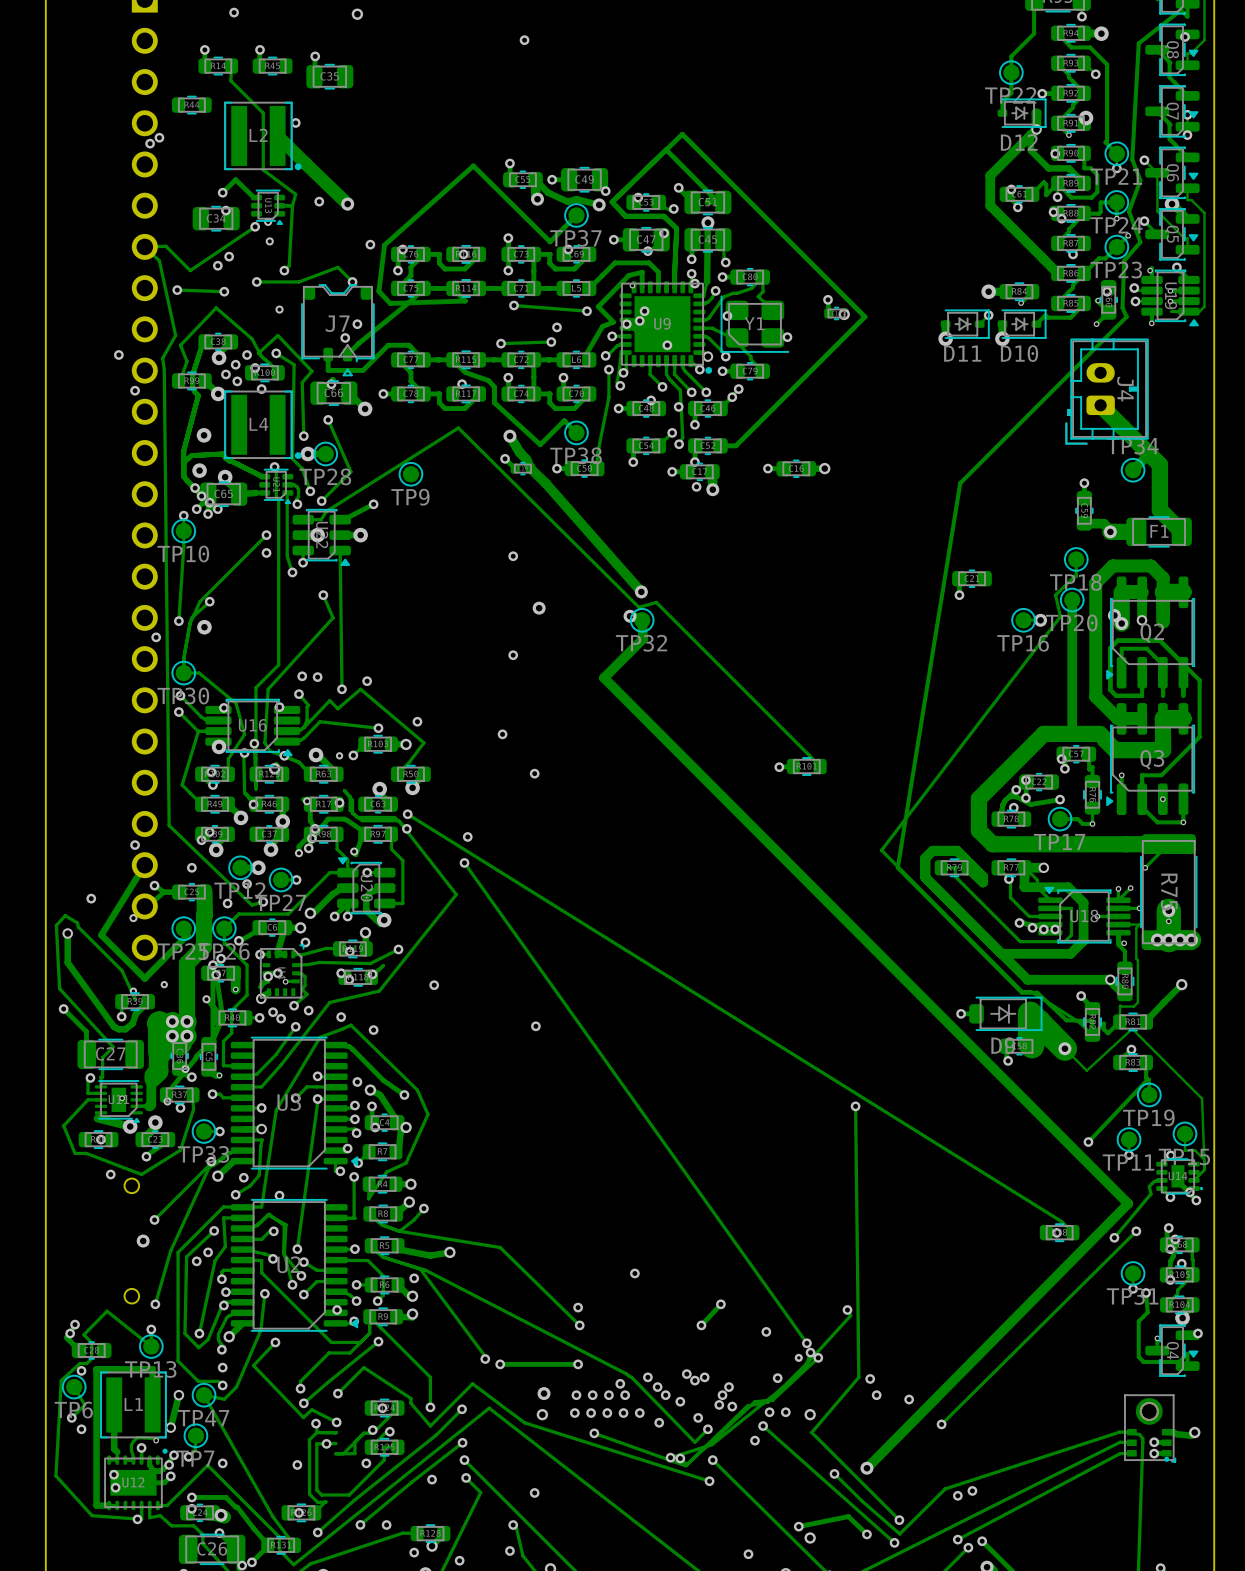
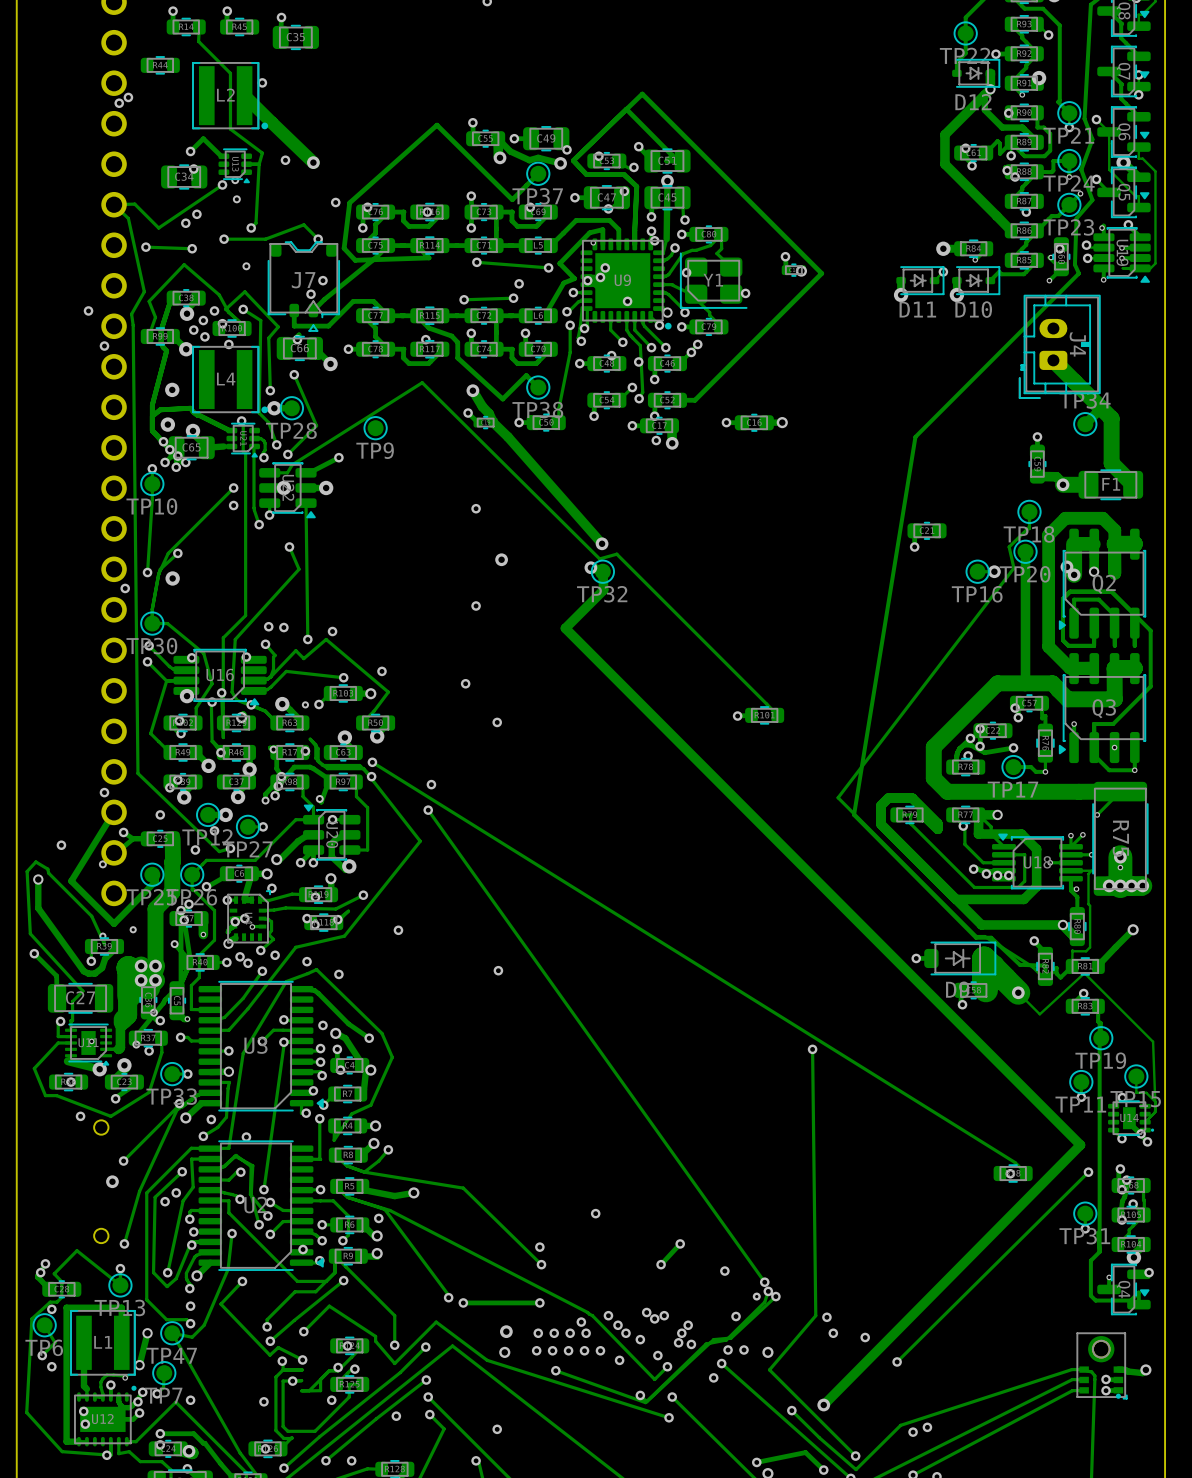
track: (1147, 1079) (1088, 1142) -> (1099, 1023) (1099, 1251)
via: (1088, 1142) -> none
track: (1157, 1180) (1149, 1186) (1150, 1193) (1114, 1237) -> none
via: (1114, 1237) -> none
via: (1146, 1292) -> none
track: (847, 1310) (850, 1315) (790, 1381) (711, 1444) (670, 1457) -> none
via: (847, 1310) -> none
via: (670, 1457) -> none

